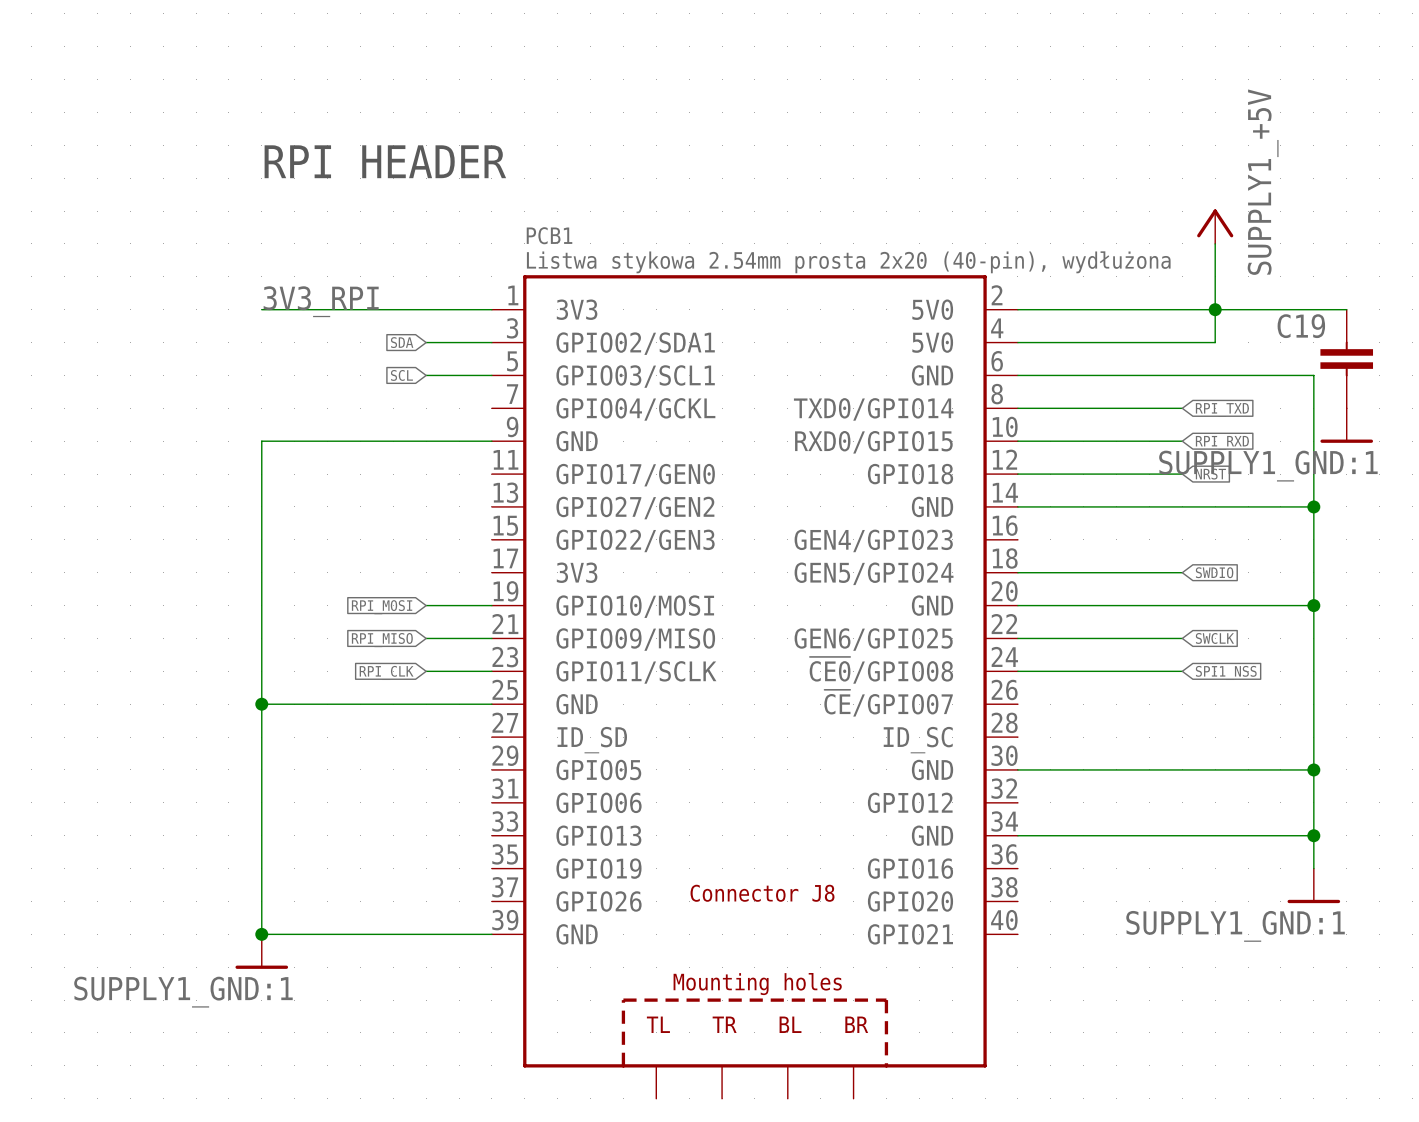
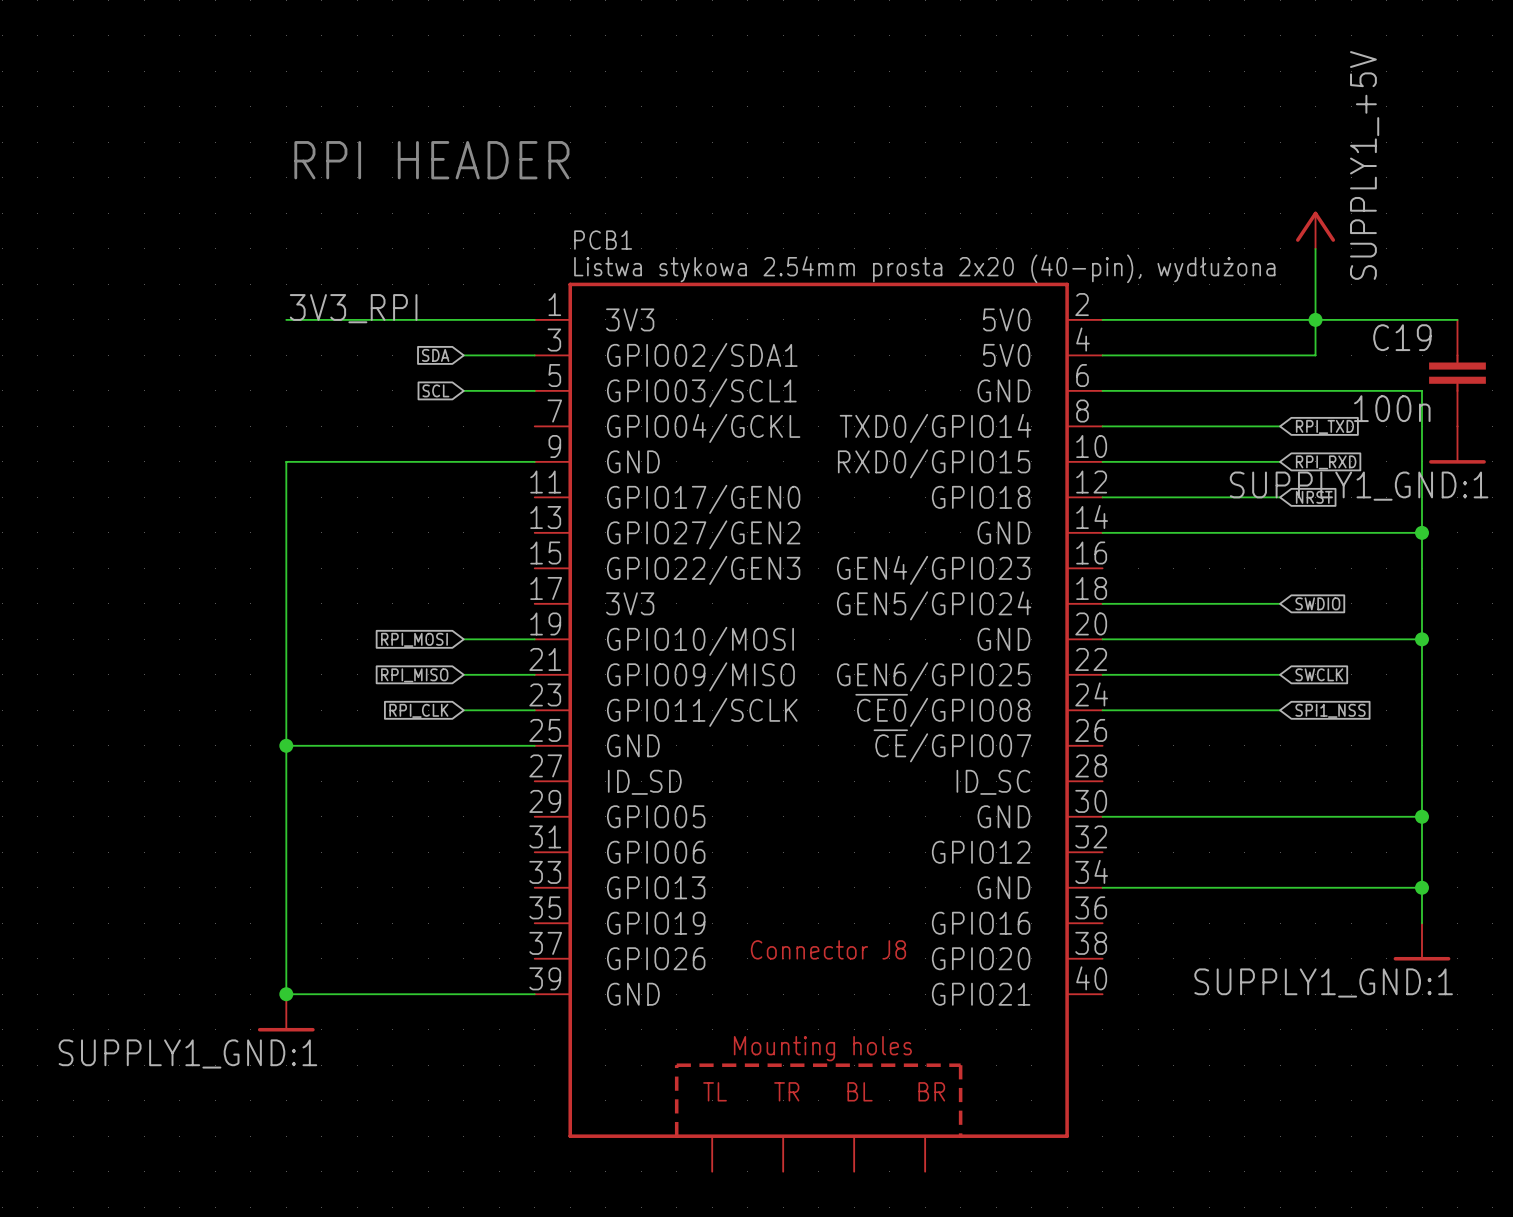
C19 value: none -> 100n (1392, 408)

